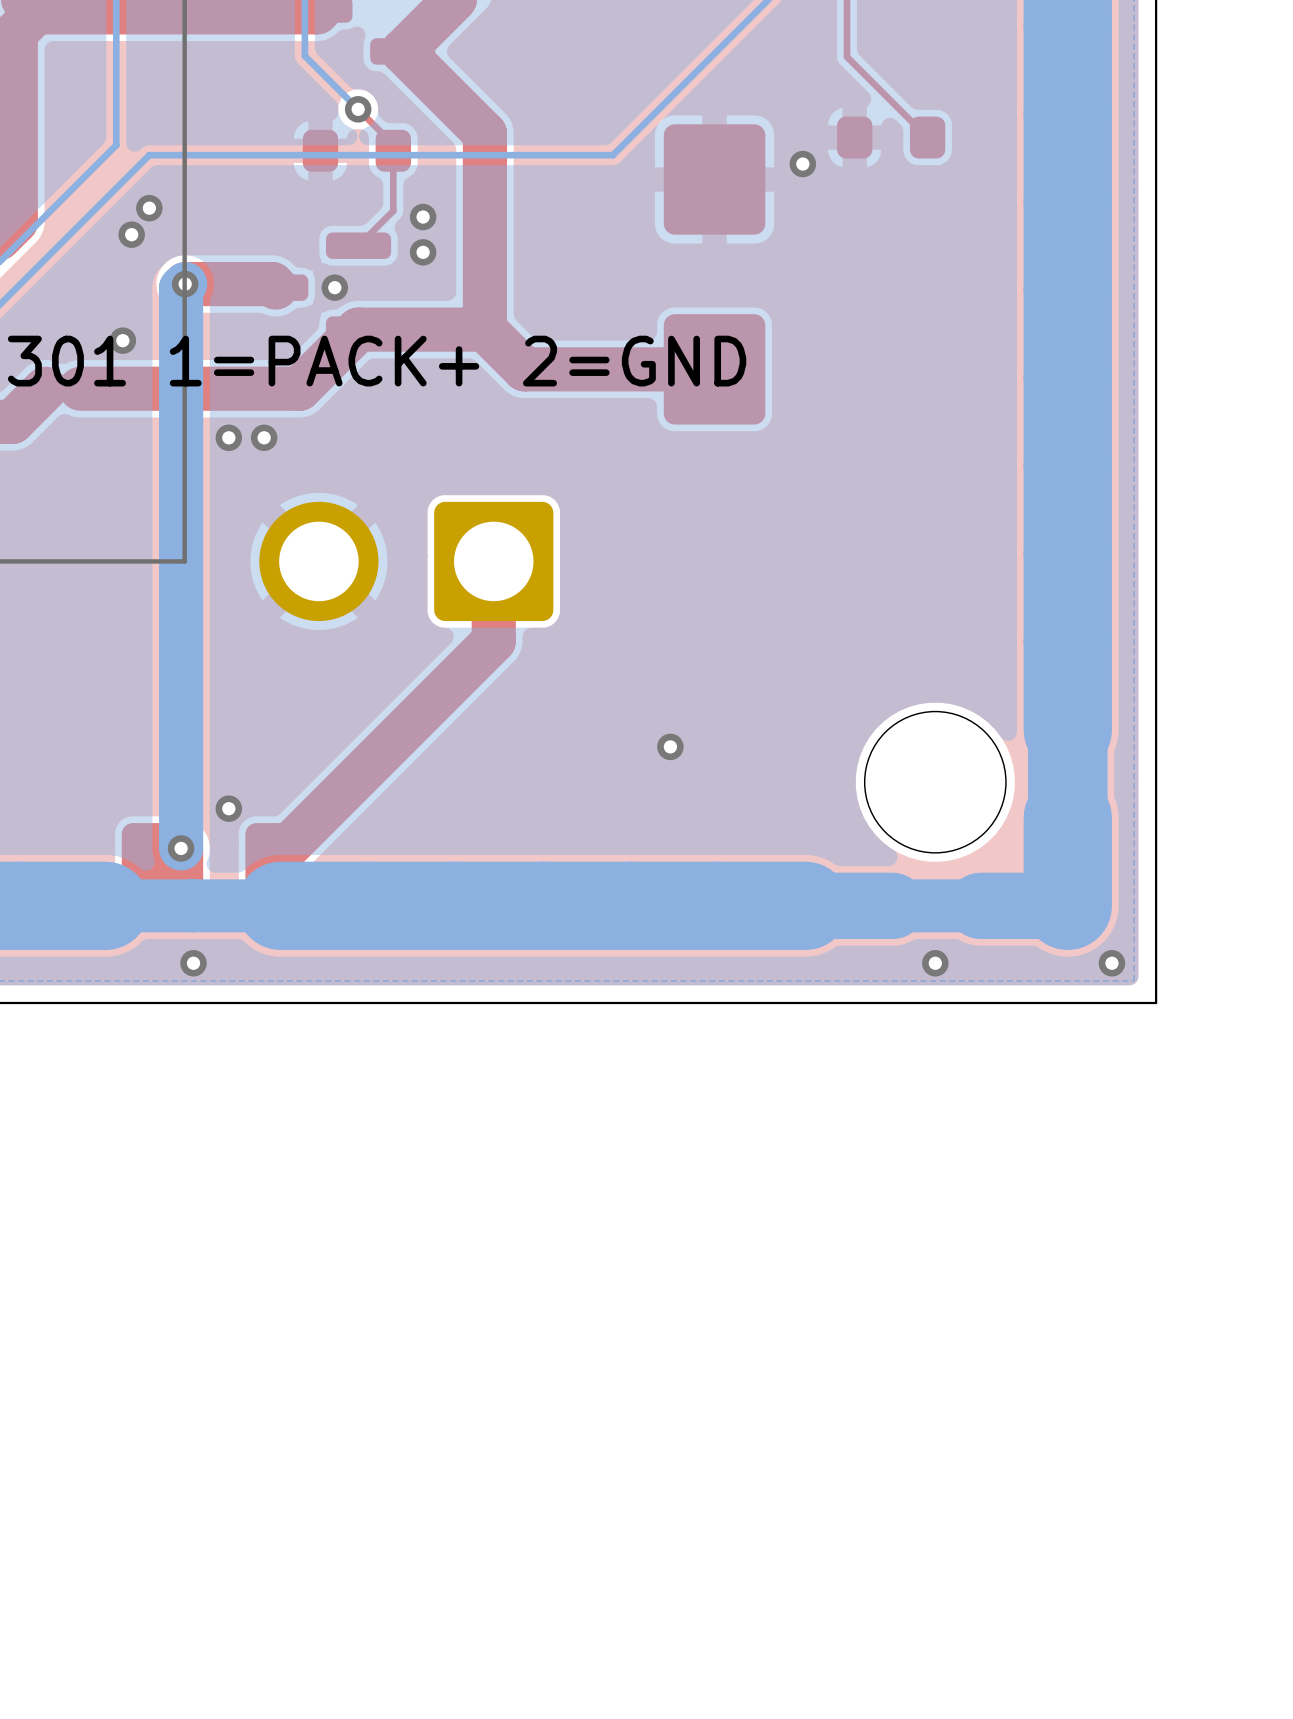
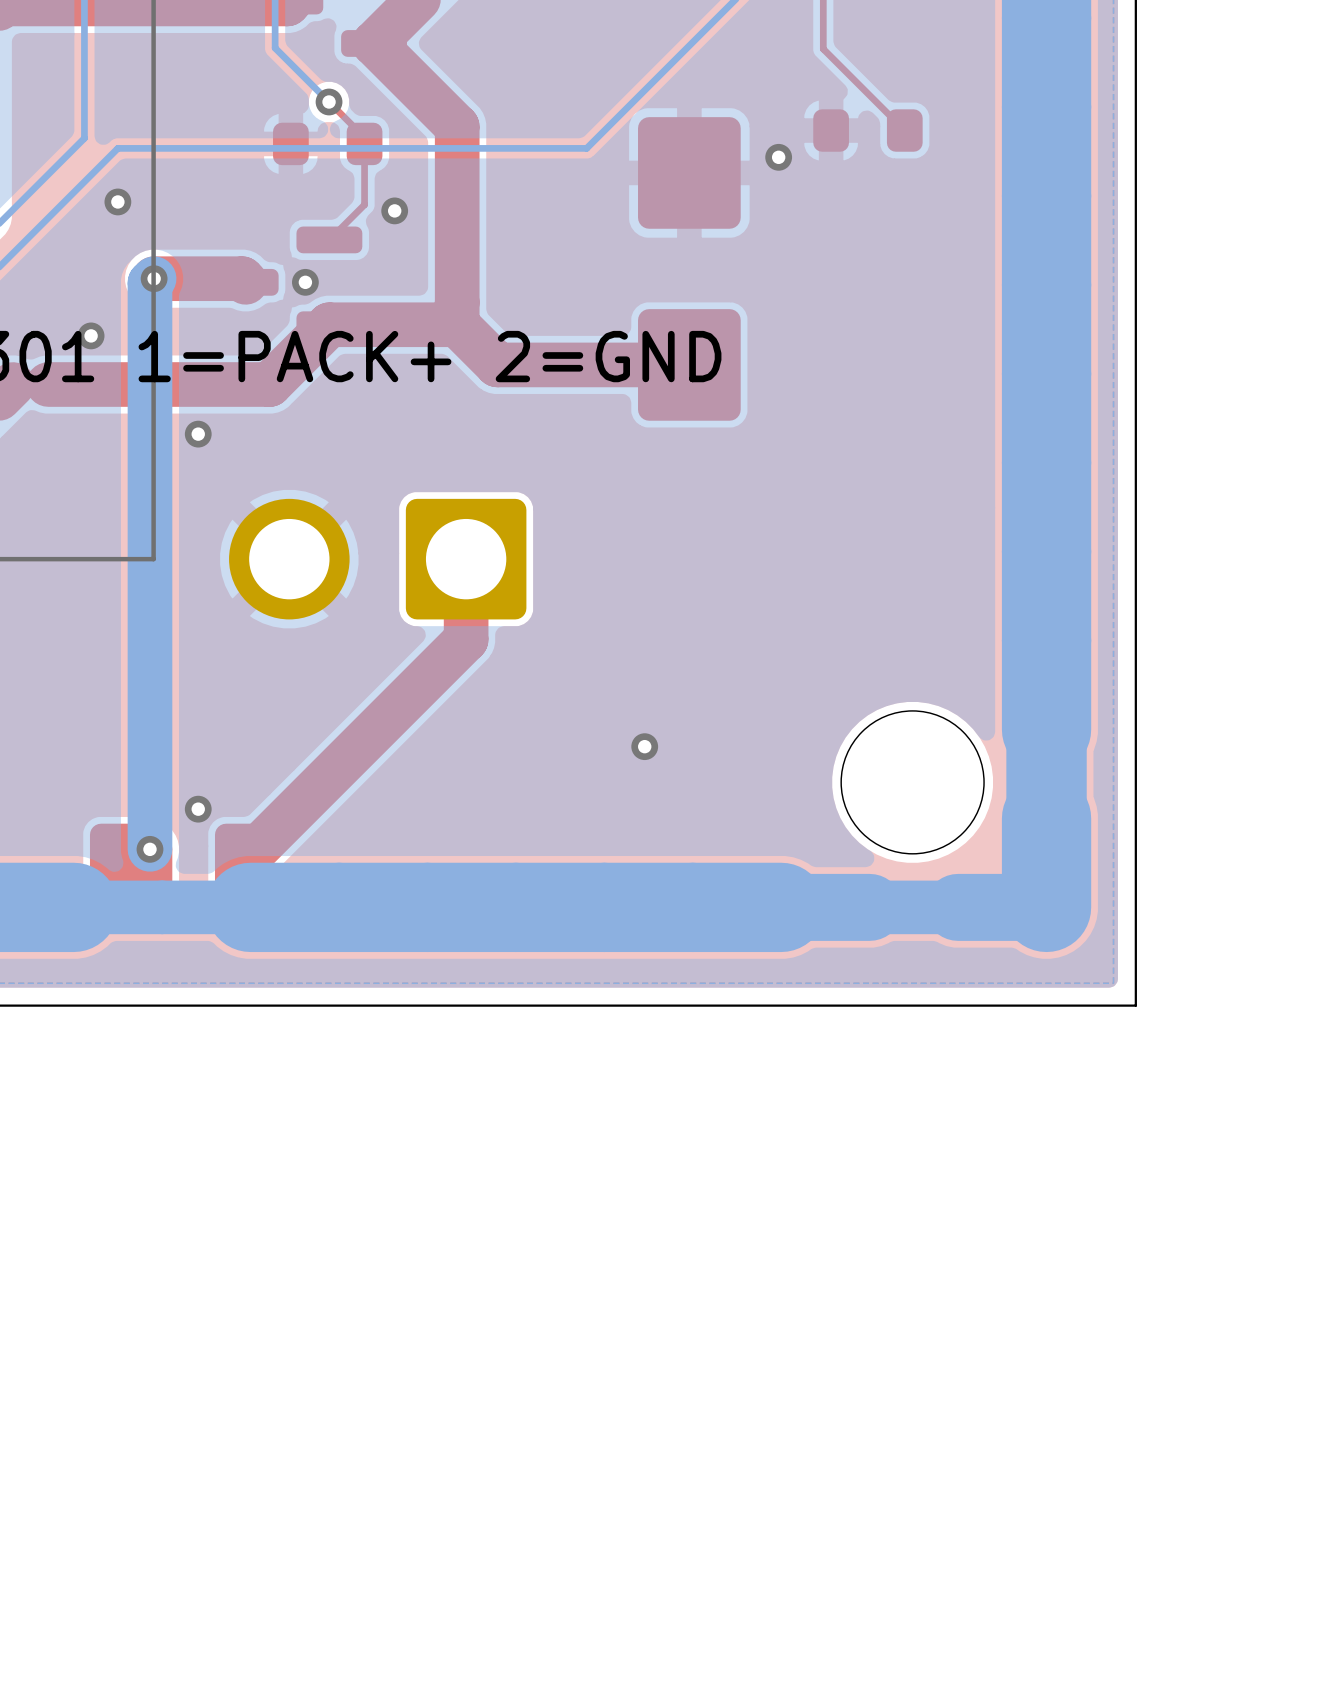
via: (131, 234) -> none
via: (423, 252) -> none
via: (264, 437) -> none
via: (193, 963) -> none
via: (935, 963) -> none
via: (1111, 963) -> none

